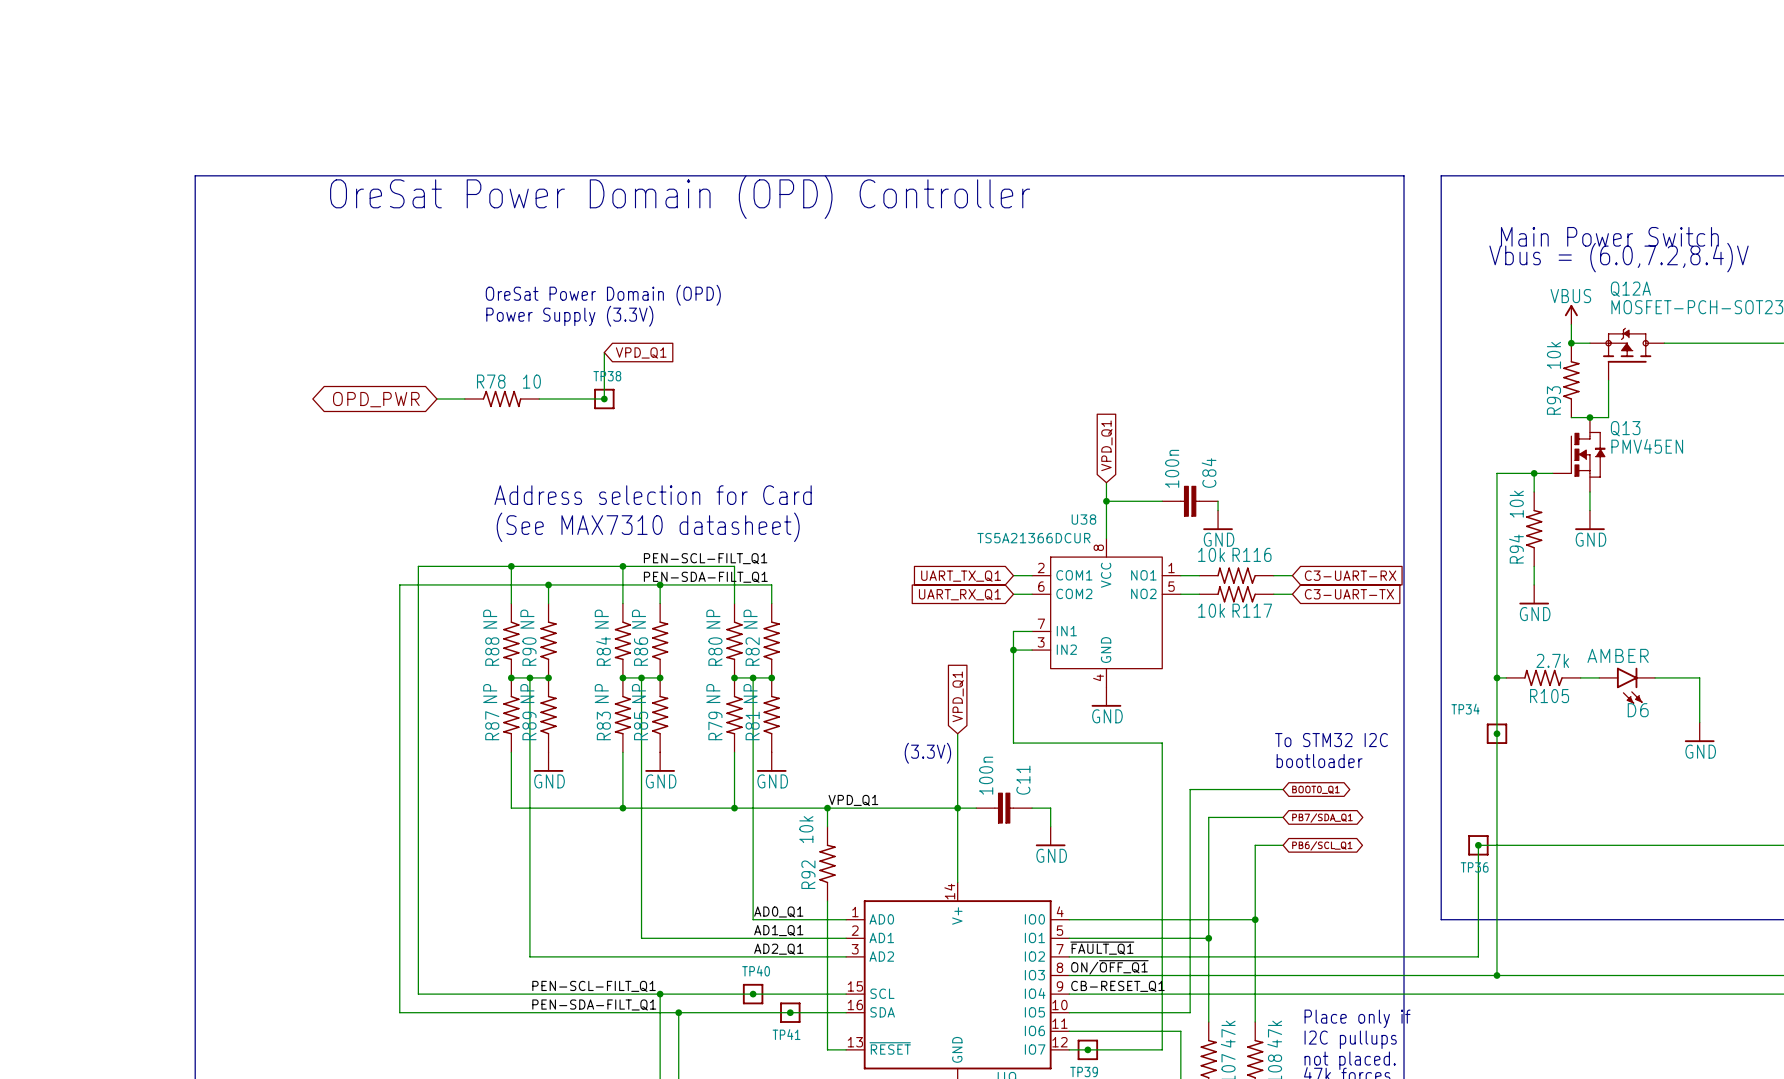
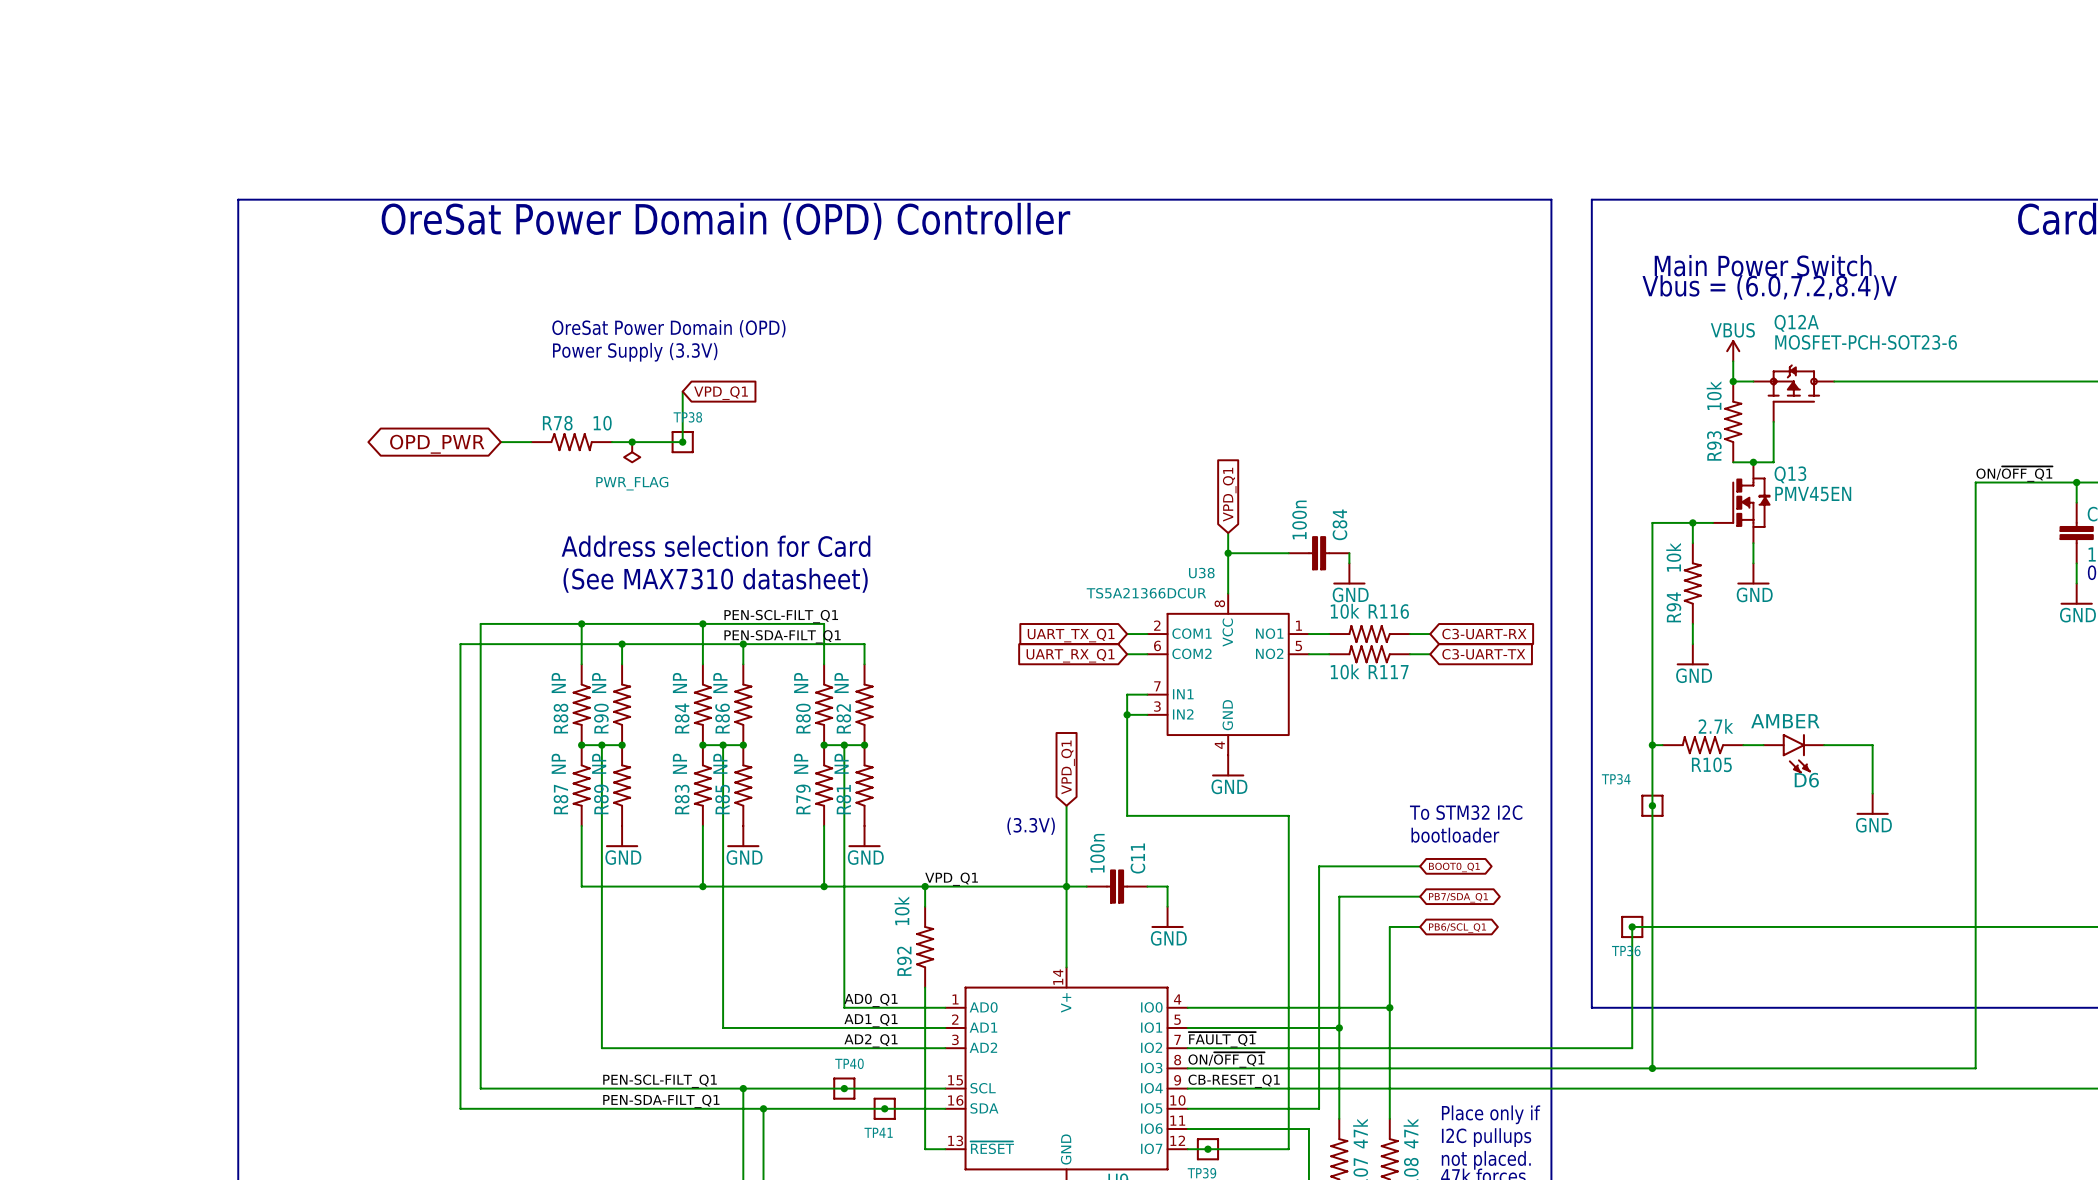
junction: none -> (632, 442)
power symbol: none -> PWR_FLAG (632, 452)

